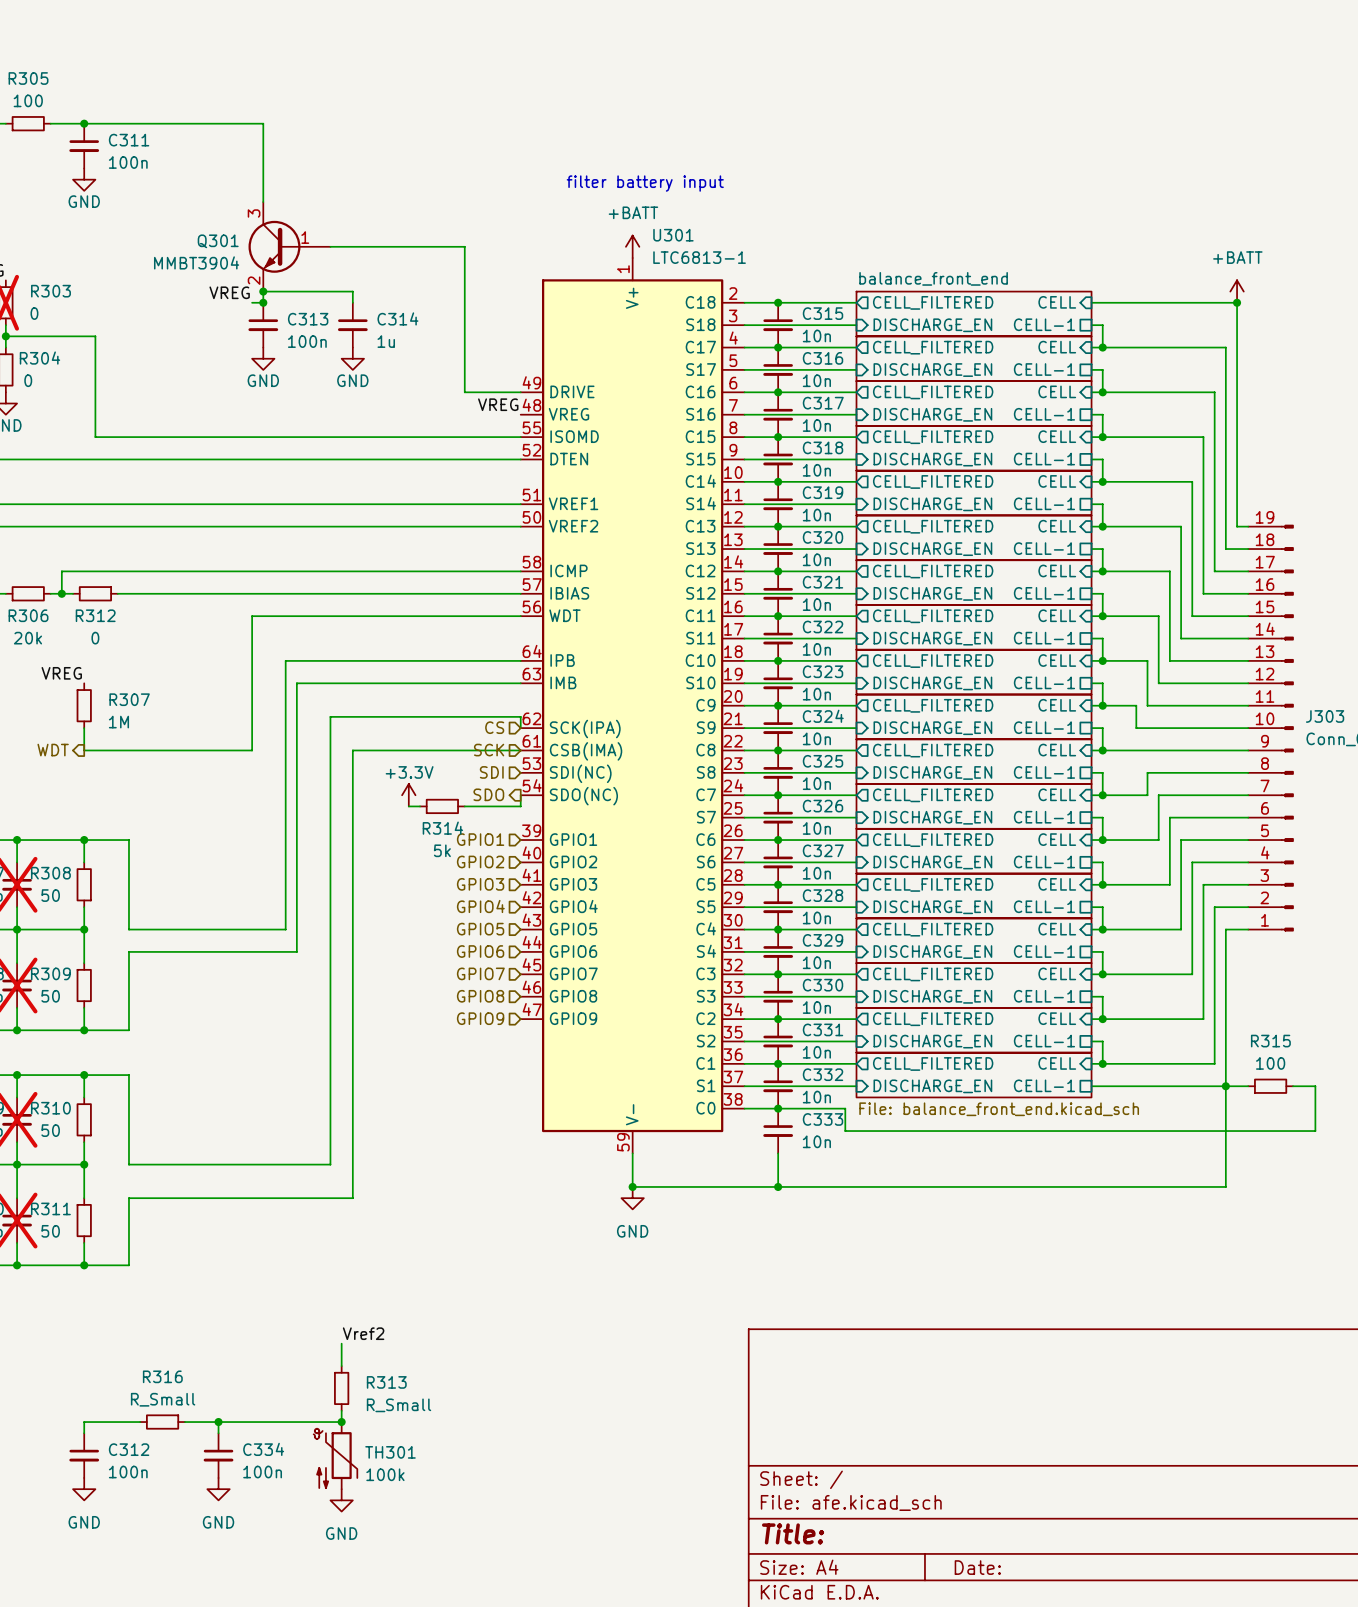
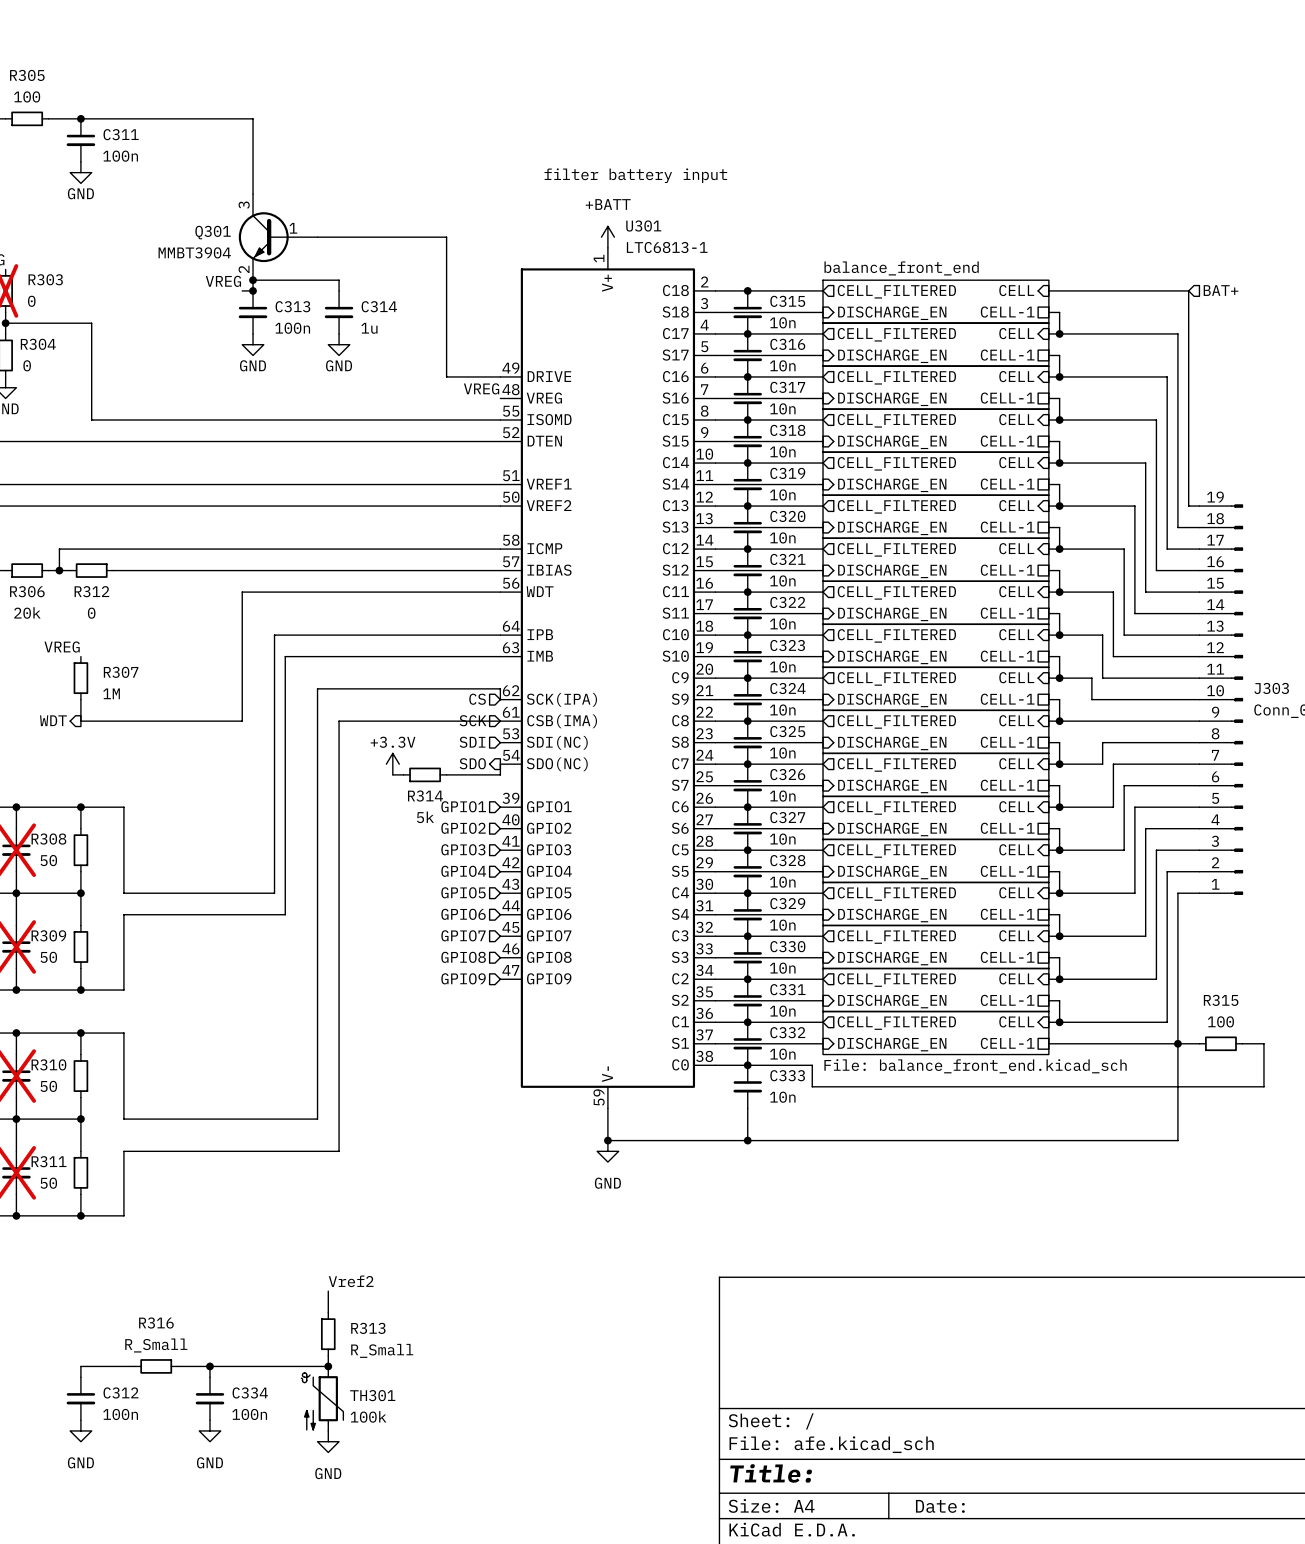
power symbol: +BATT (1237, 291) -> none
junction: (1237, 302) -> none
hierarchical label: none -> BAT+ (1221, 290)

